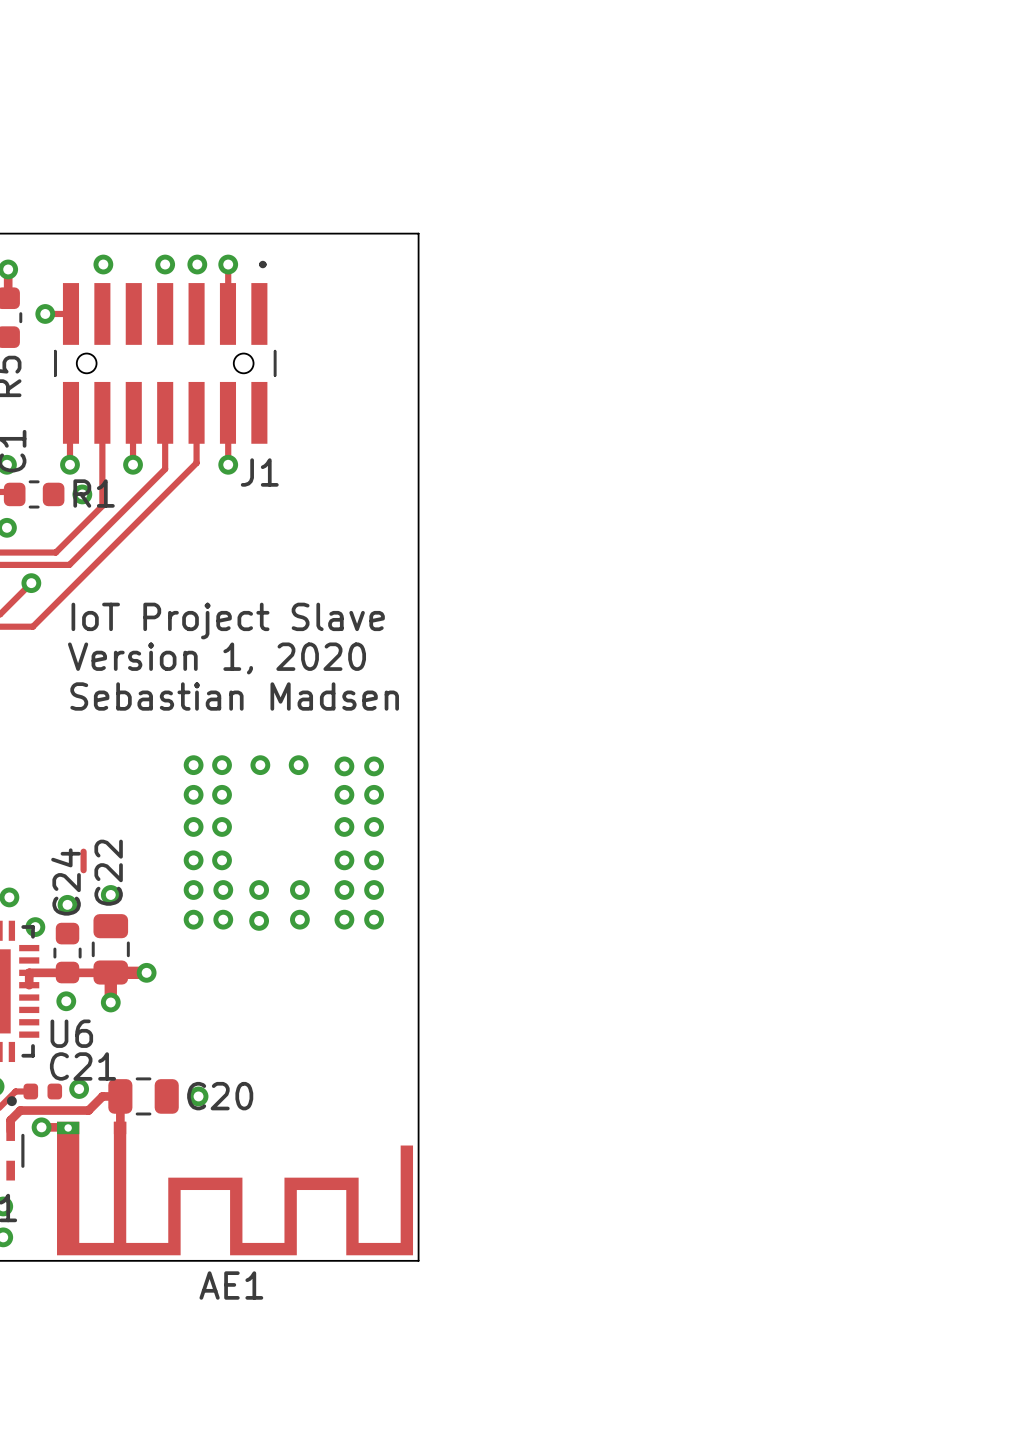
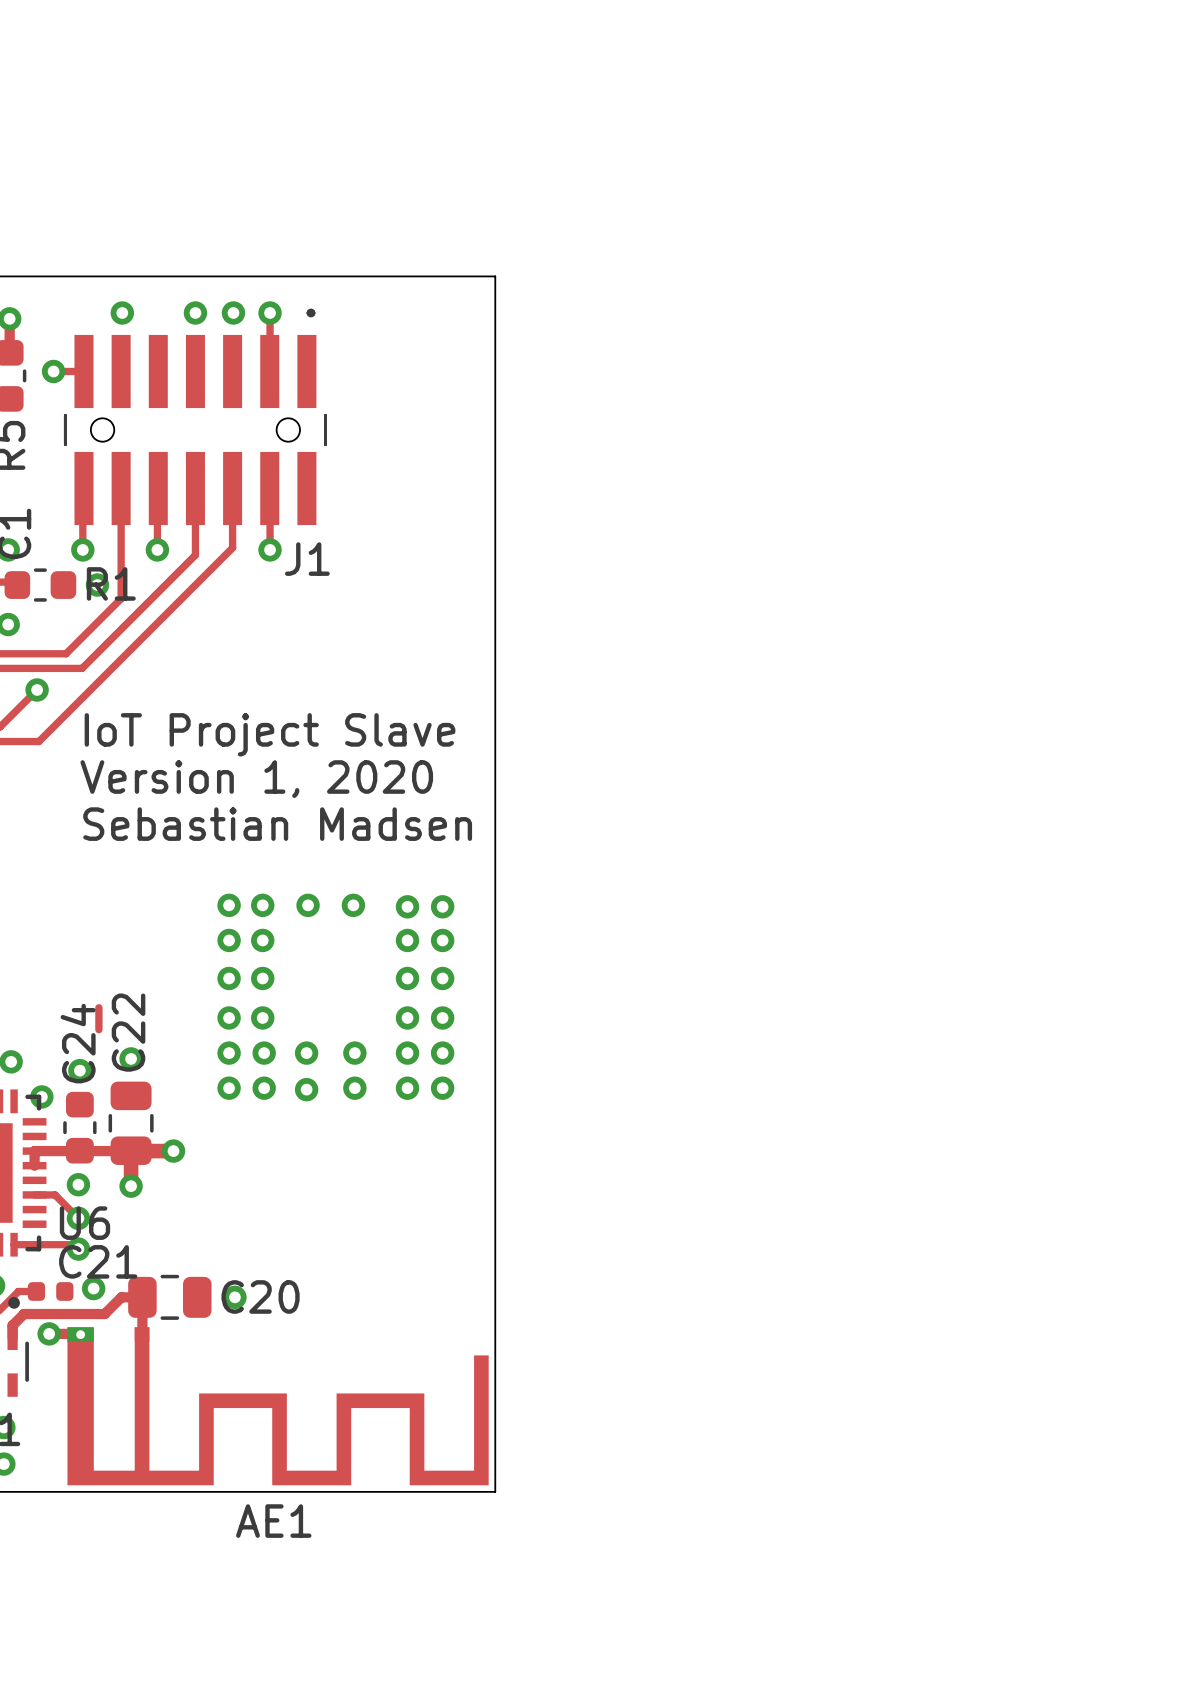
track: none -> (34, 1194) (55, 1194) (78, 1218)
via: none -> (78, 1218)
track: none -> (14, 1244) (74, 1244) (78, 1249)
via: none -> (78, 1249)

